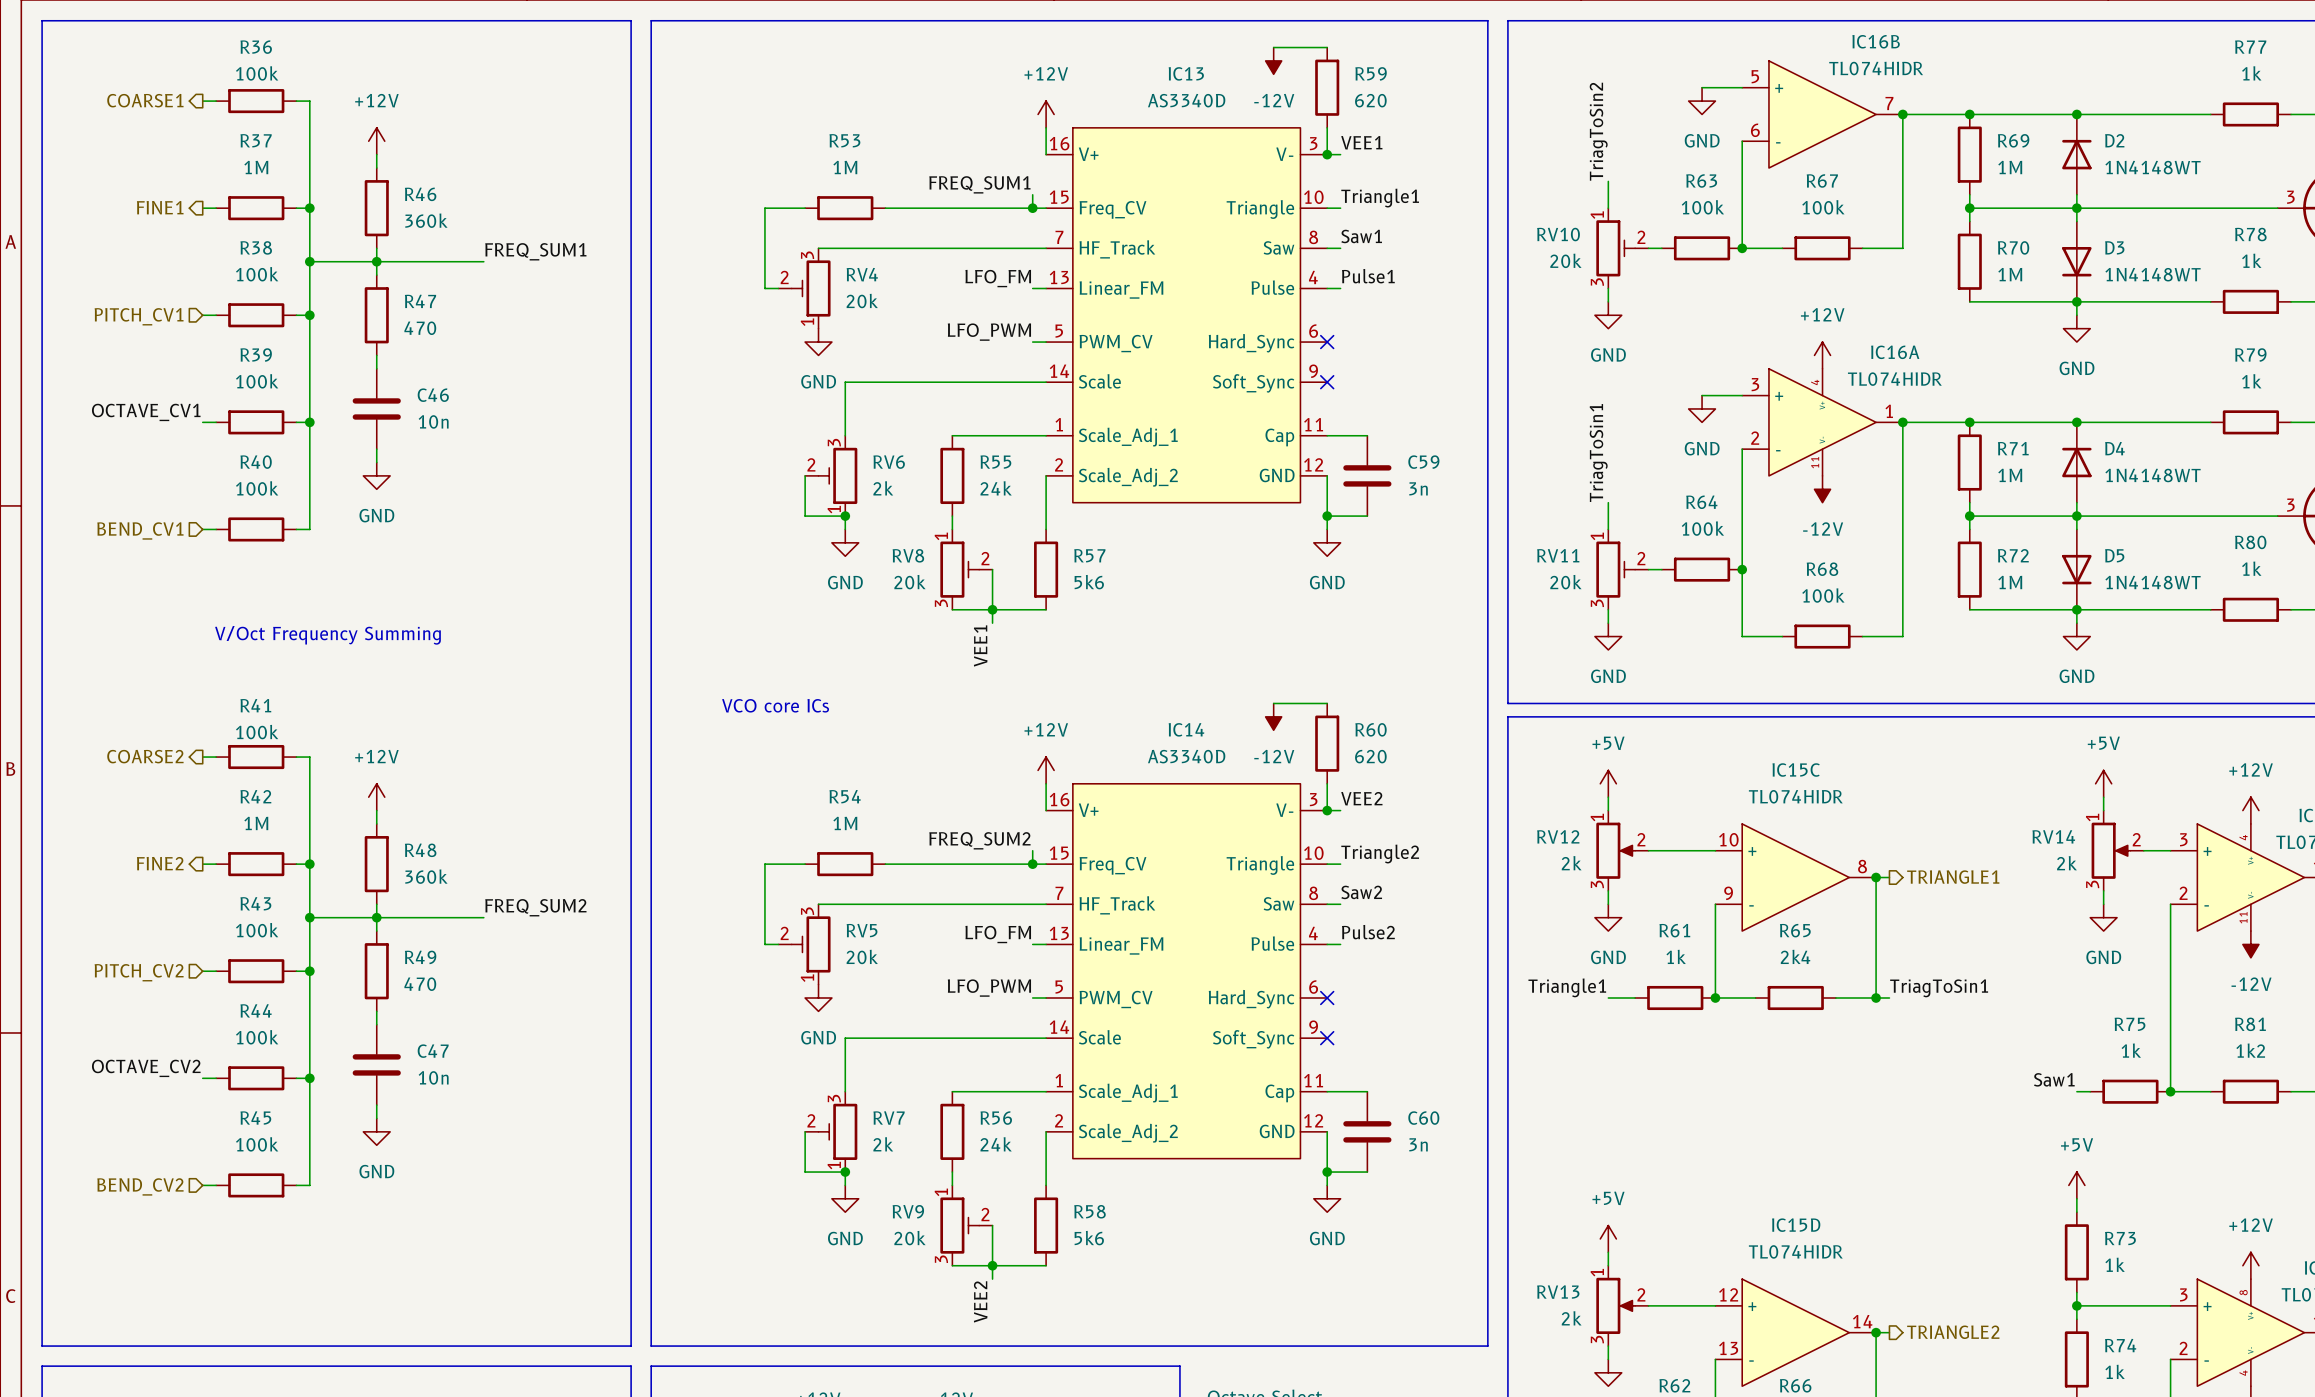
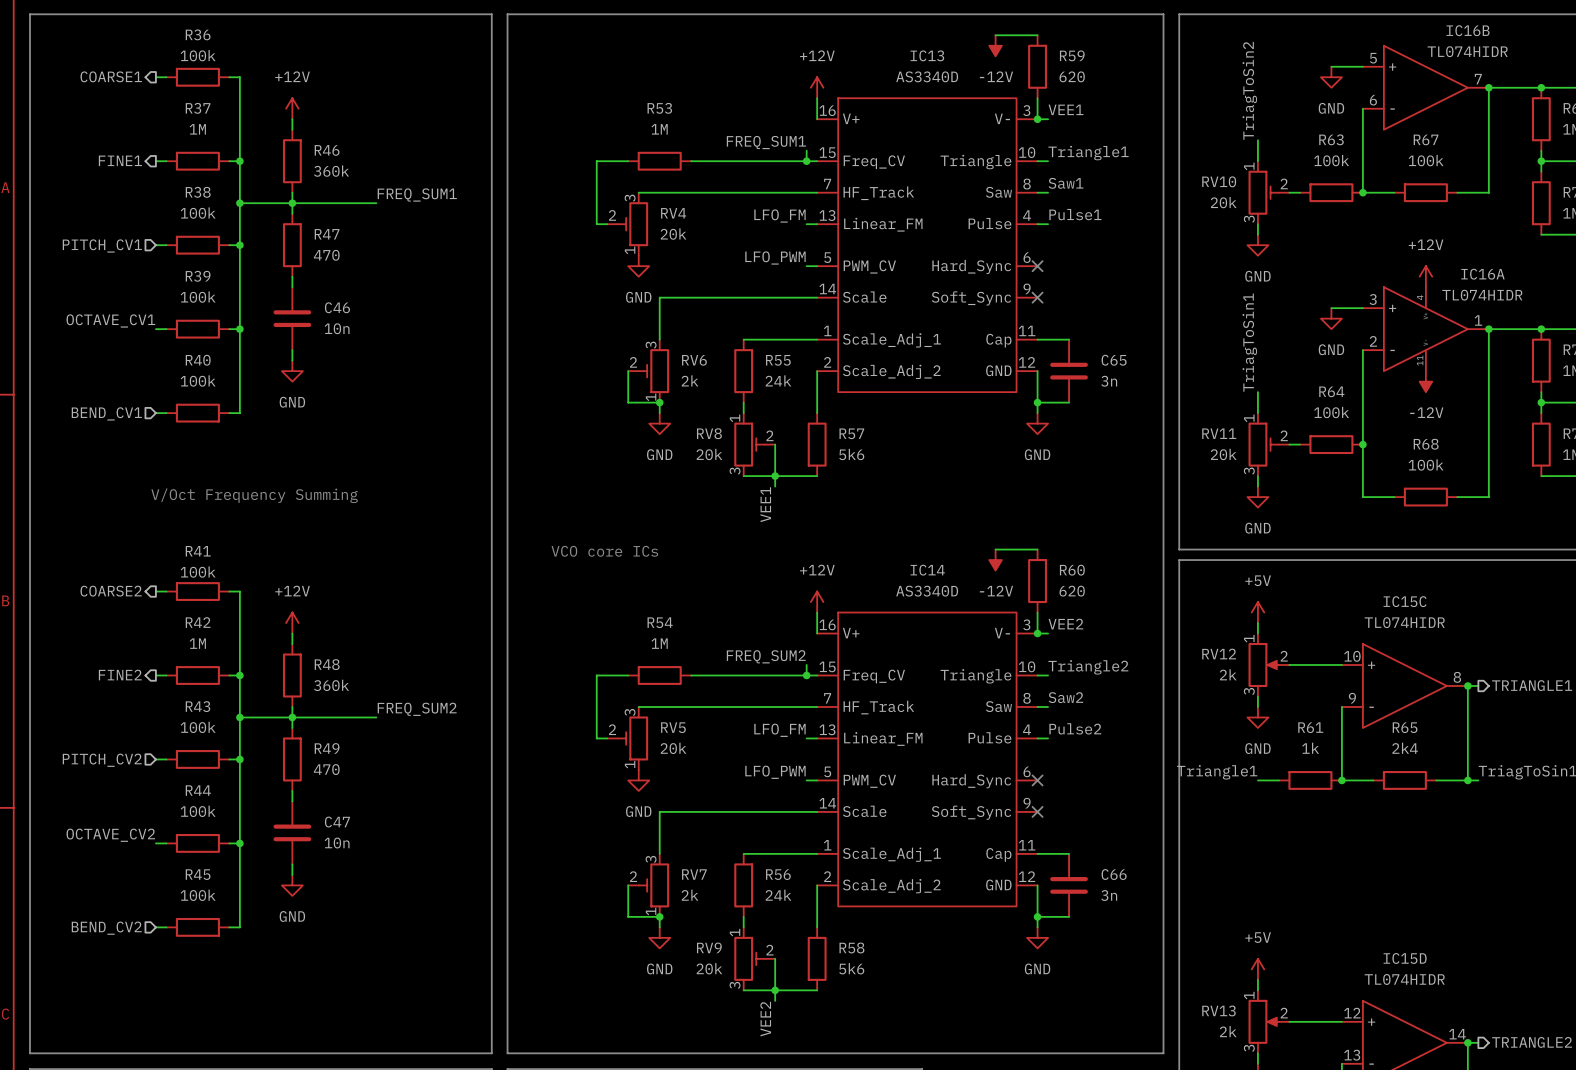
C59 name: C59 (1423, 462) -> C65 (1114, 360)
C60 name: C60 (1423, 1118) -> C66 (1114, 874)

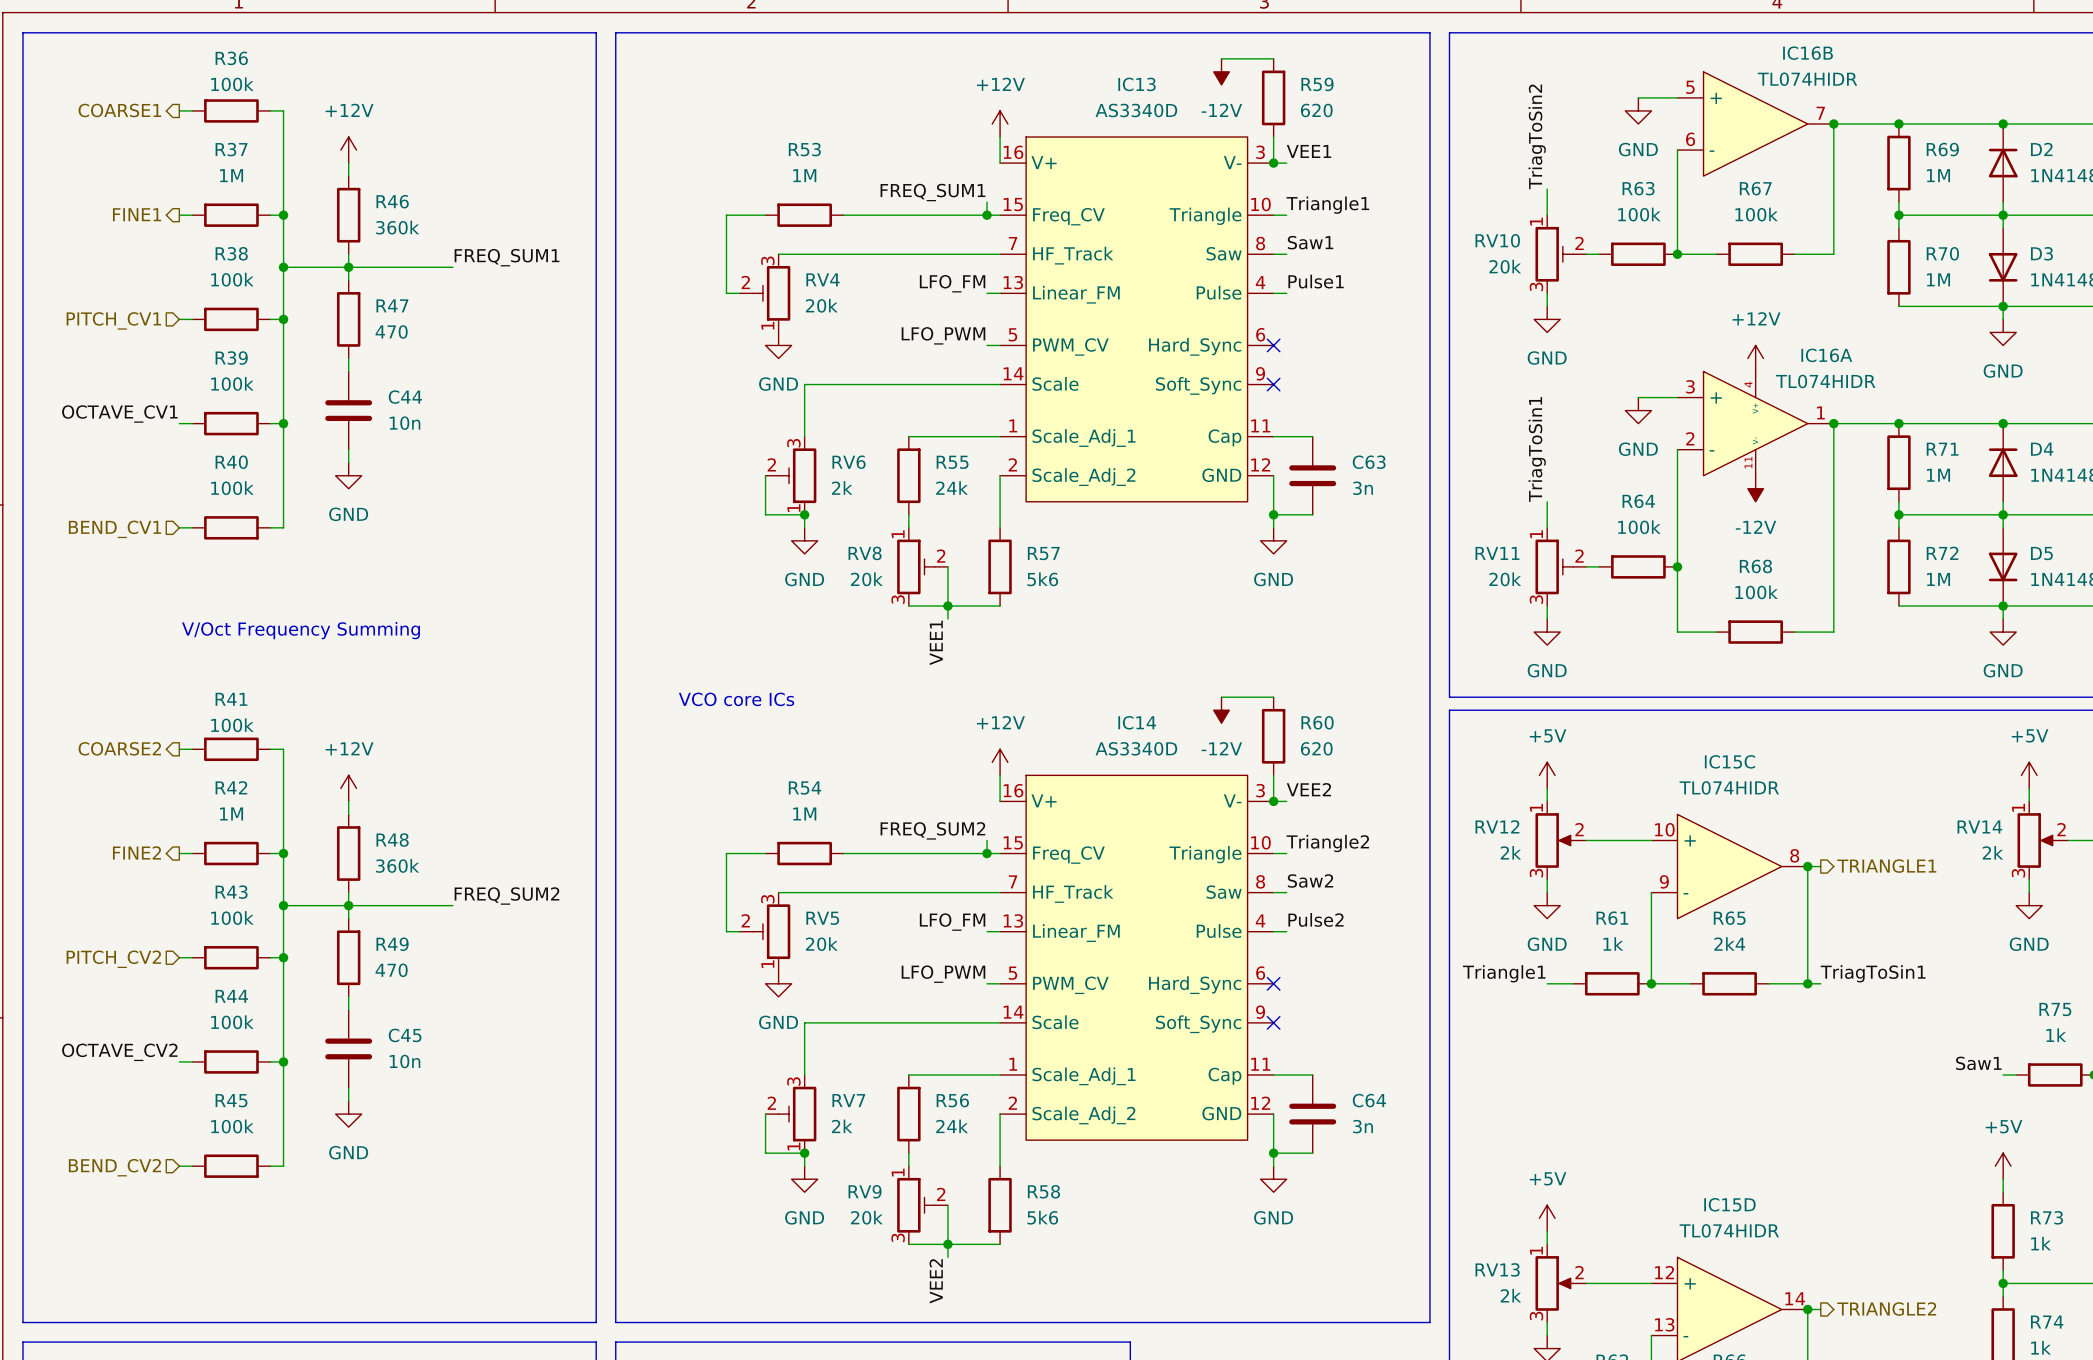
C46 name: C46 (337, 307) -> C44 (405, 397)
C65 name: C65 (1114, 360) -> C63 (1369, 462)
C47 name: C47 (337, 822) -> C45 (405, 1035)
C66 name: C66 (1114, 874) -> C64 (1369, 1100)

